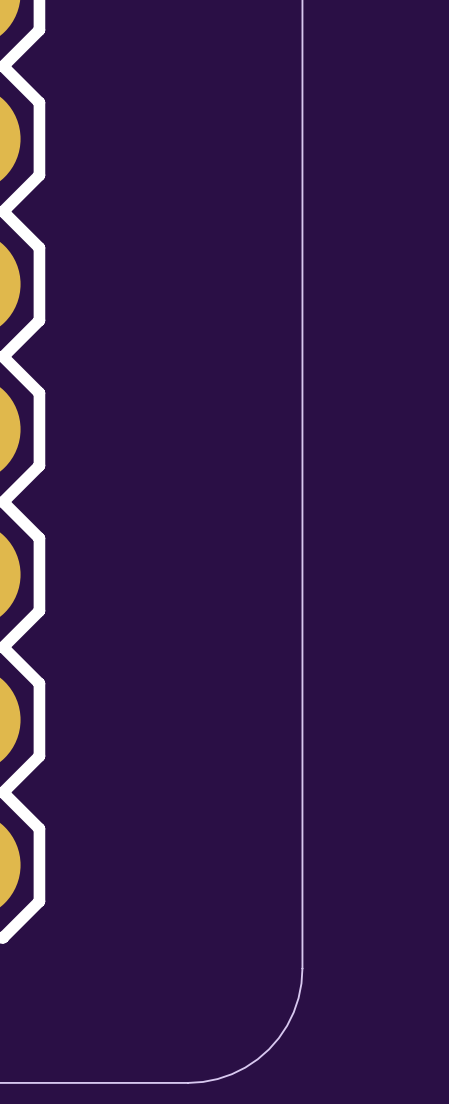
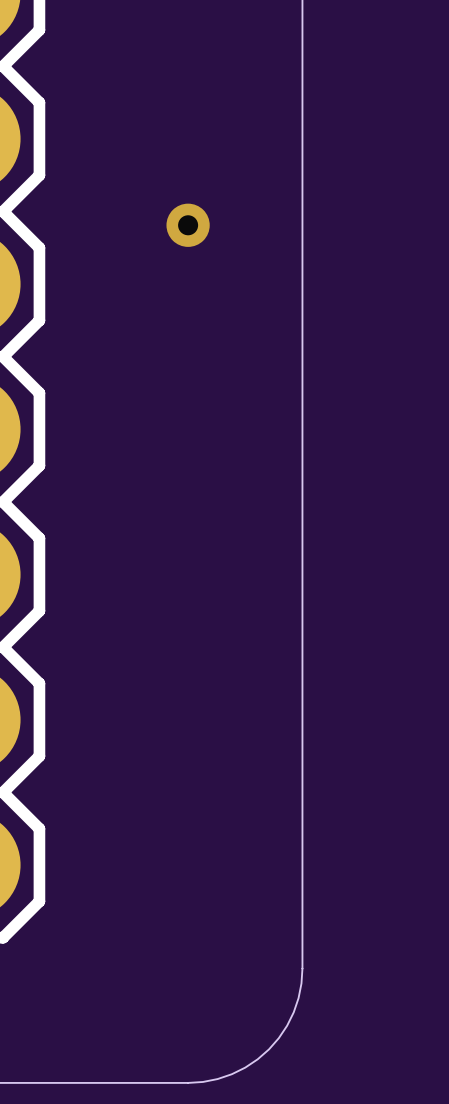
via: none -> (188, 225)

